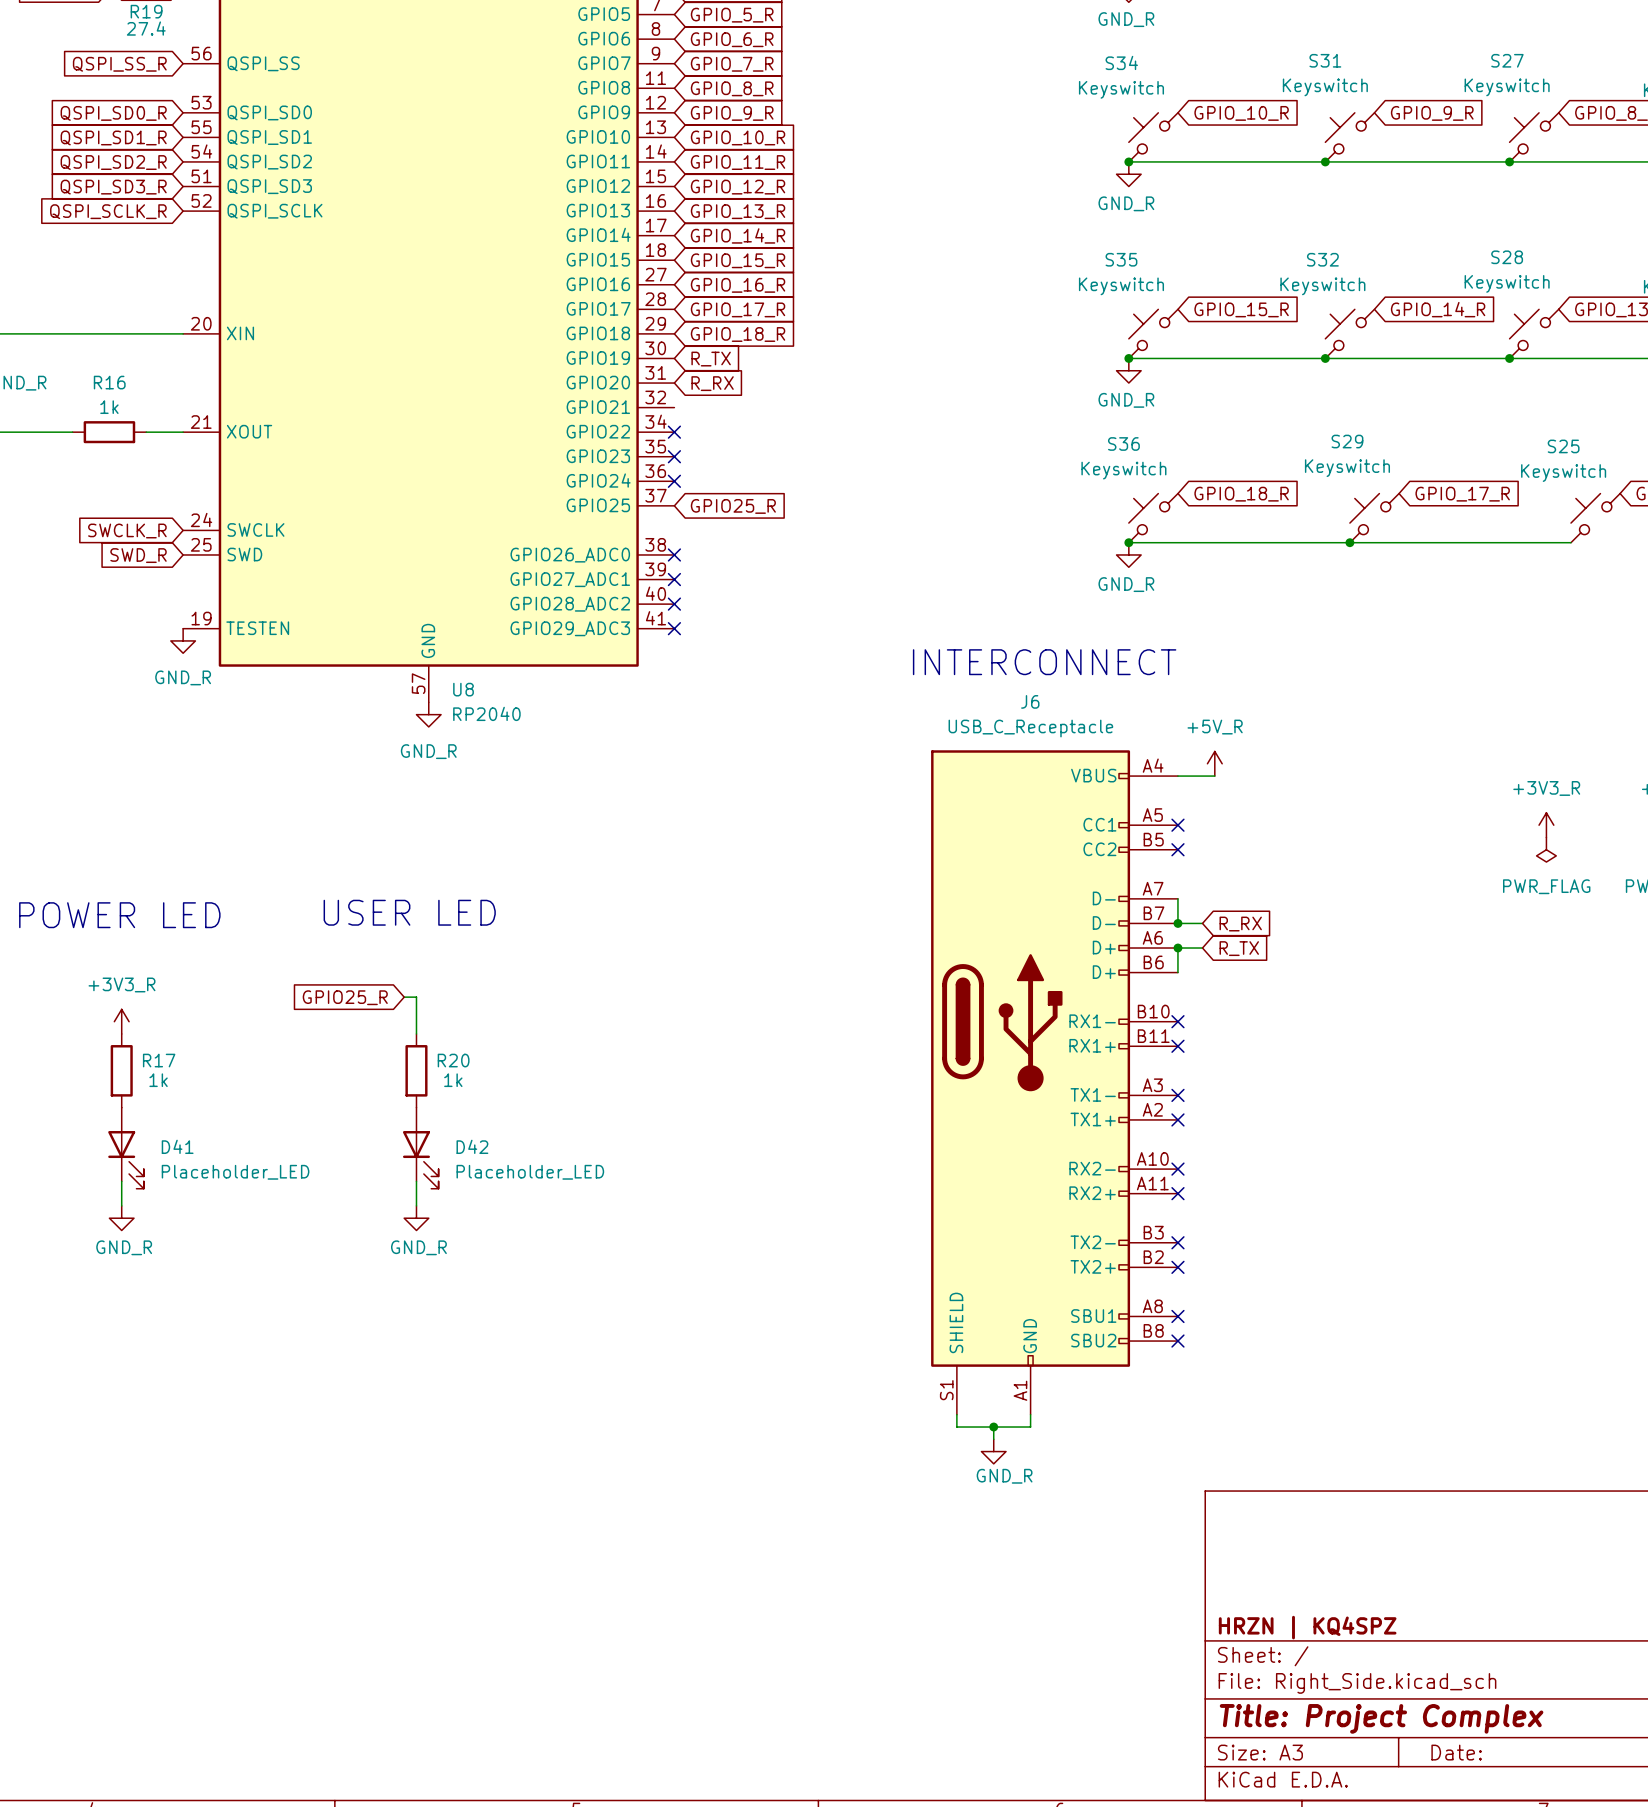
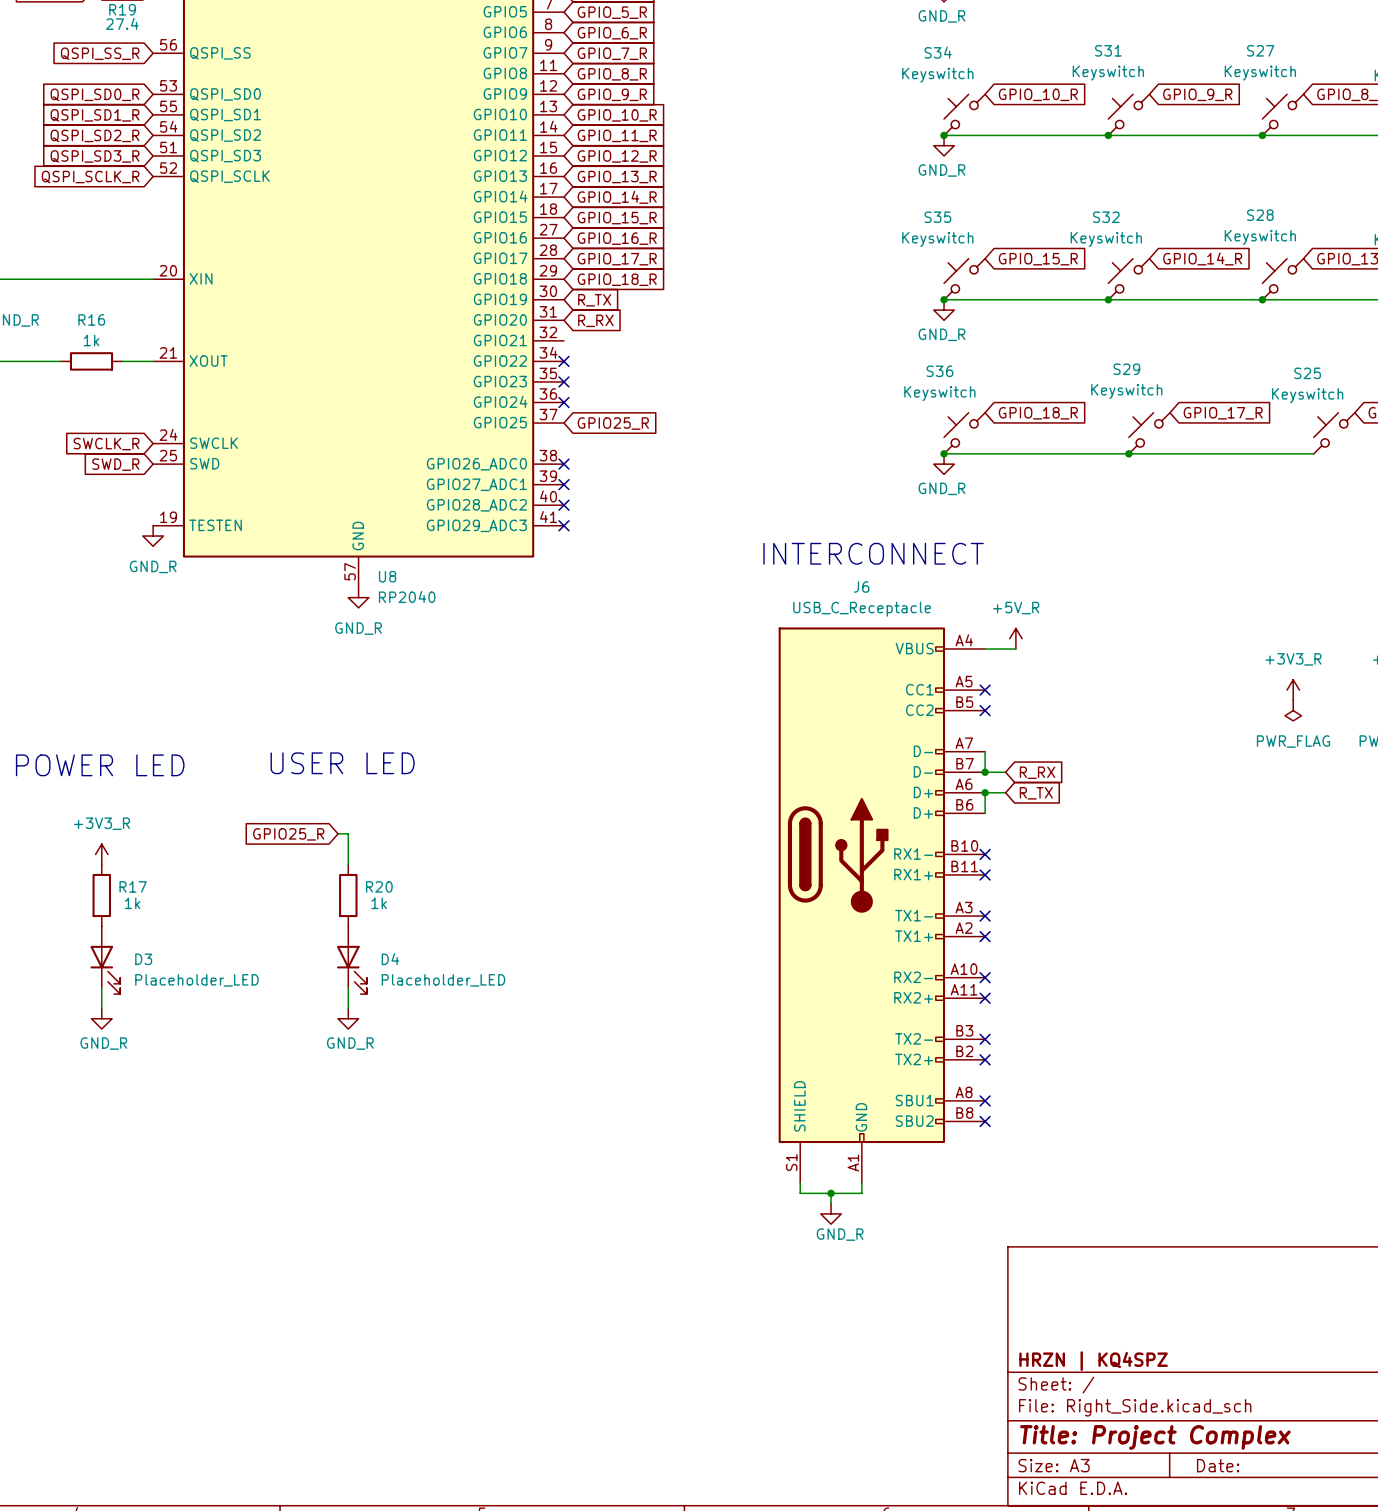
D41 name: D41 (177, 1146) -> D3 (143, 959)
D42 name: D42 (472, 1146) -> D4 (390, 959)

